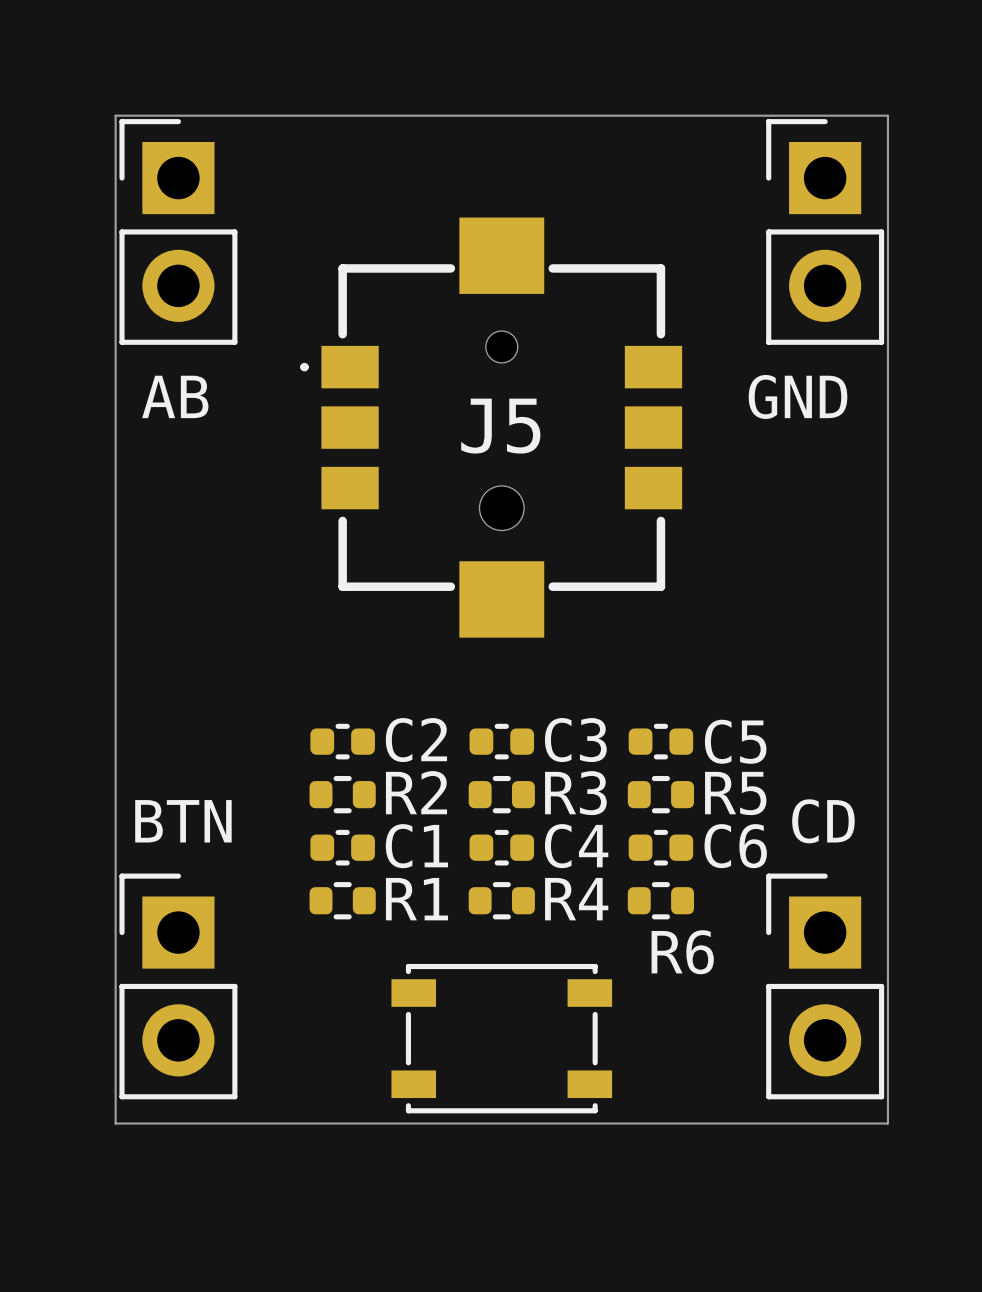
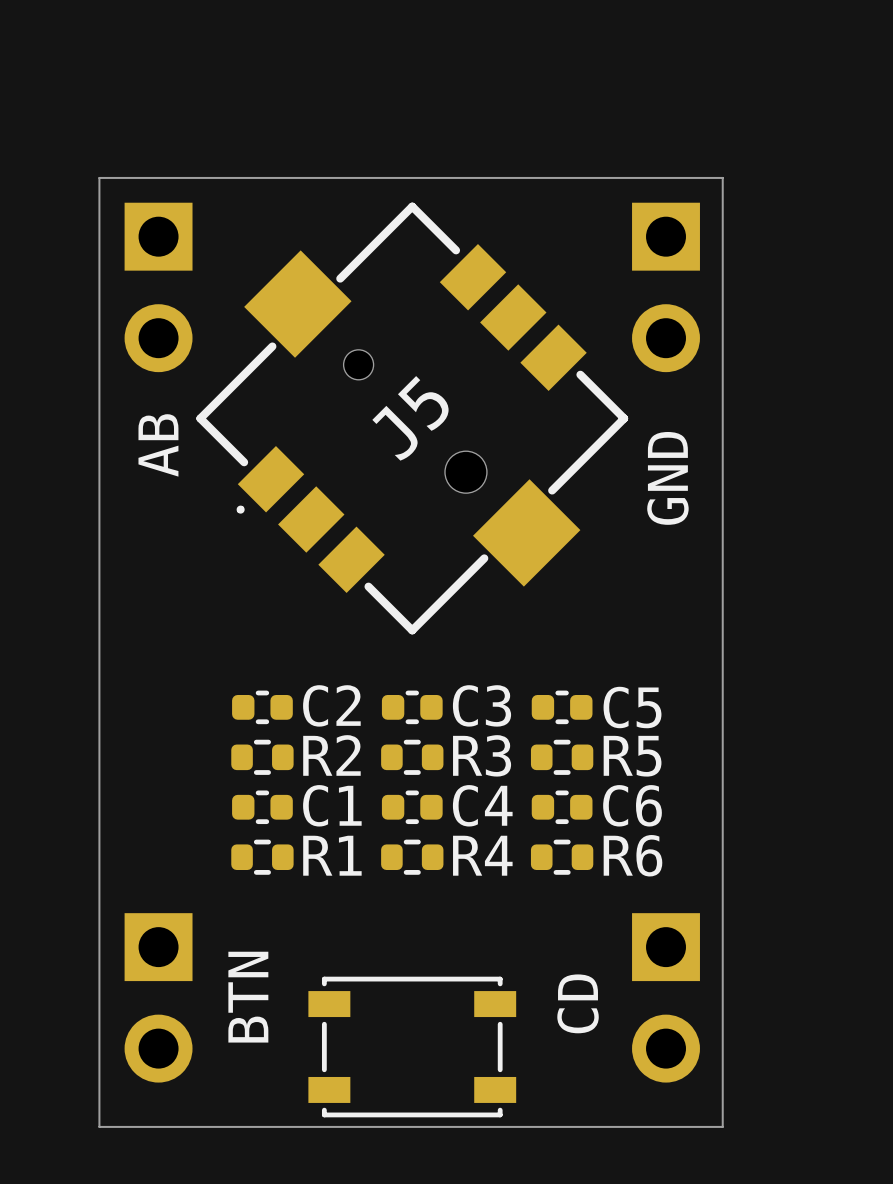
board edge: (115, 115) (887, 115) (887, 1123) (115, 1123) (115, 115) -> (99, 177) (99, 1126) (722, 1126) (722, 177) (99, 177)
J5 footprint: [300, 217, 683, 638] -> [196, 202, 629, 635]
part side: top (178, 231) -> bottom (158, 287)
part side: top (825, 231) -> bottom (666, 287)
text rotation: 0° (175, 396) -> 90° counterclockwise (158, 445)
text rotation: 0° (798, 396) -> 90° counterclockwise (667, 478)
text rotation: 0° (183, 821) -> 90° counterclockwise (248, 997)
text position: BTN (183, 821) -> BTN (248, 997)
text rotation: 0° (823, 821) -> 90° counterclockwise (578, 1003)
text position: CD (823, 821) -> CD (578, 1003)
R6 name position: R6 (682, 952) -> R6 (632, 855)
part side: top (178, 986) -> bottom (158, 997)
part side: top (825, 986) -> bottom (666, 997)
part position: (501, 1038) -> (412, 1047)

